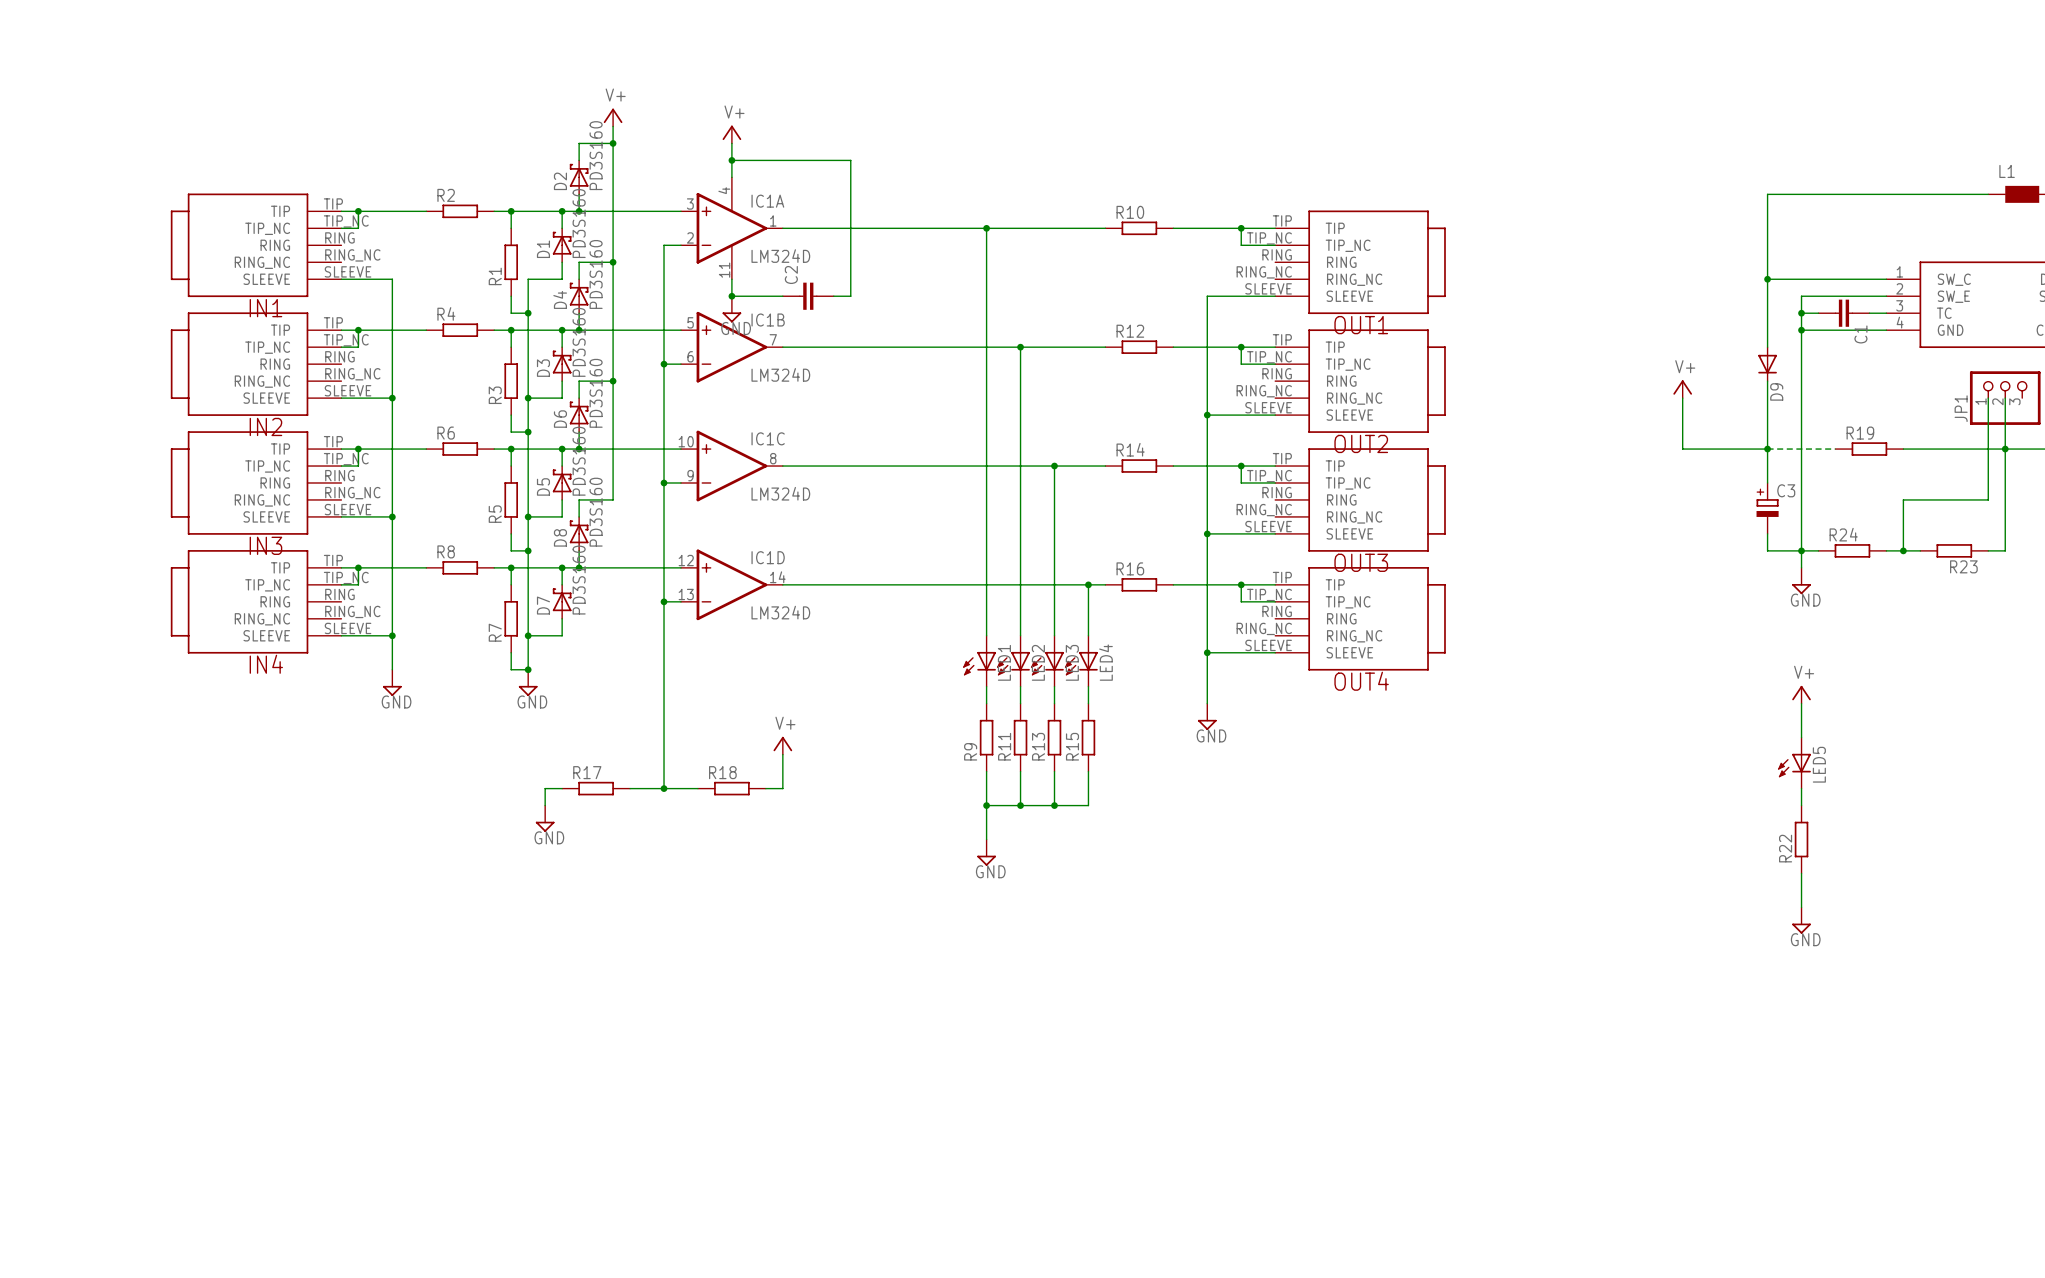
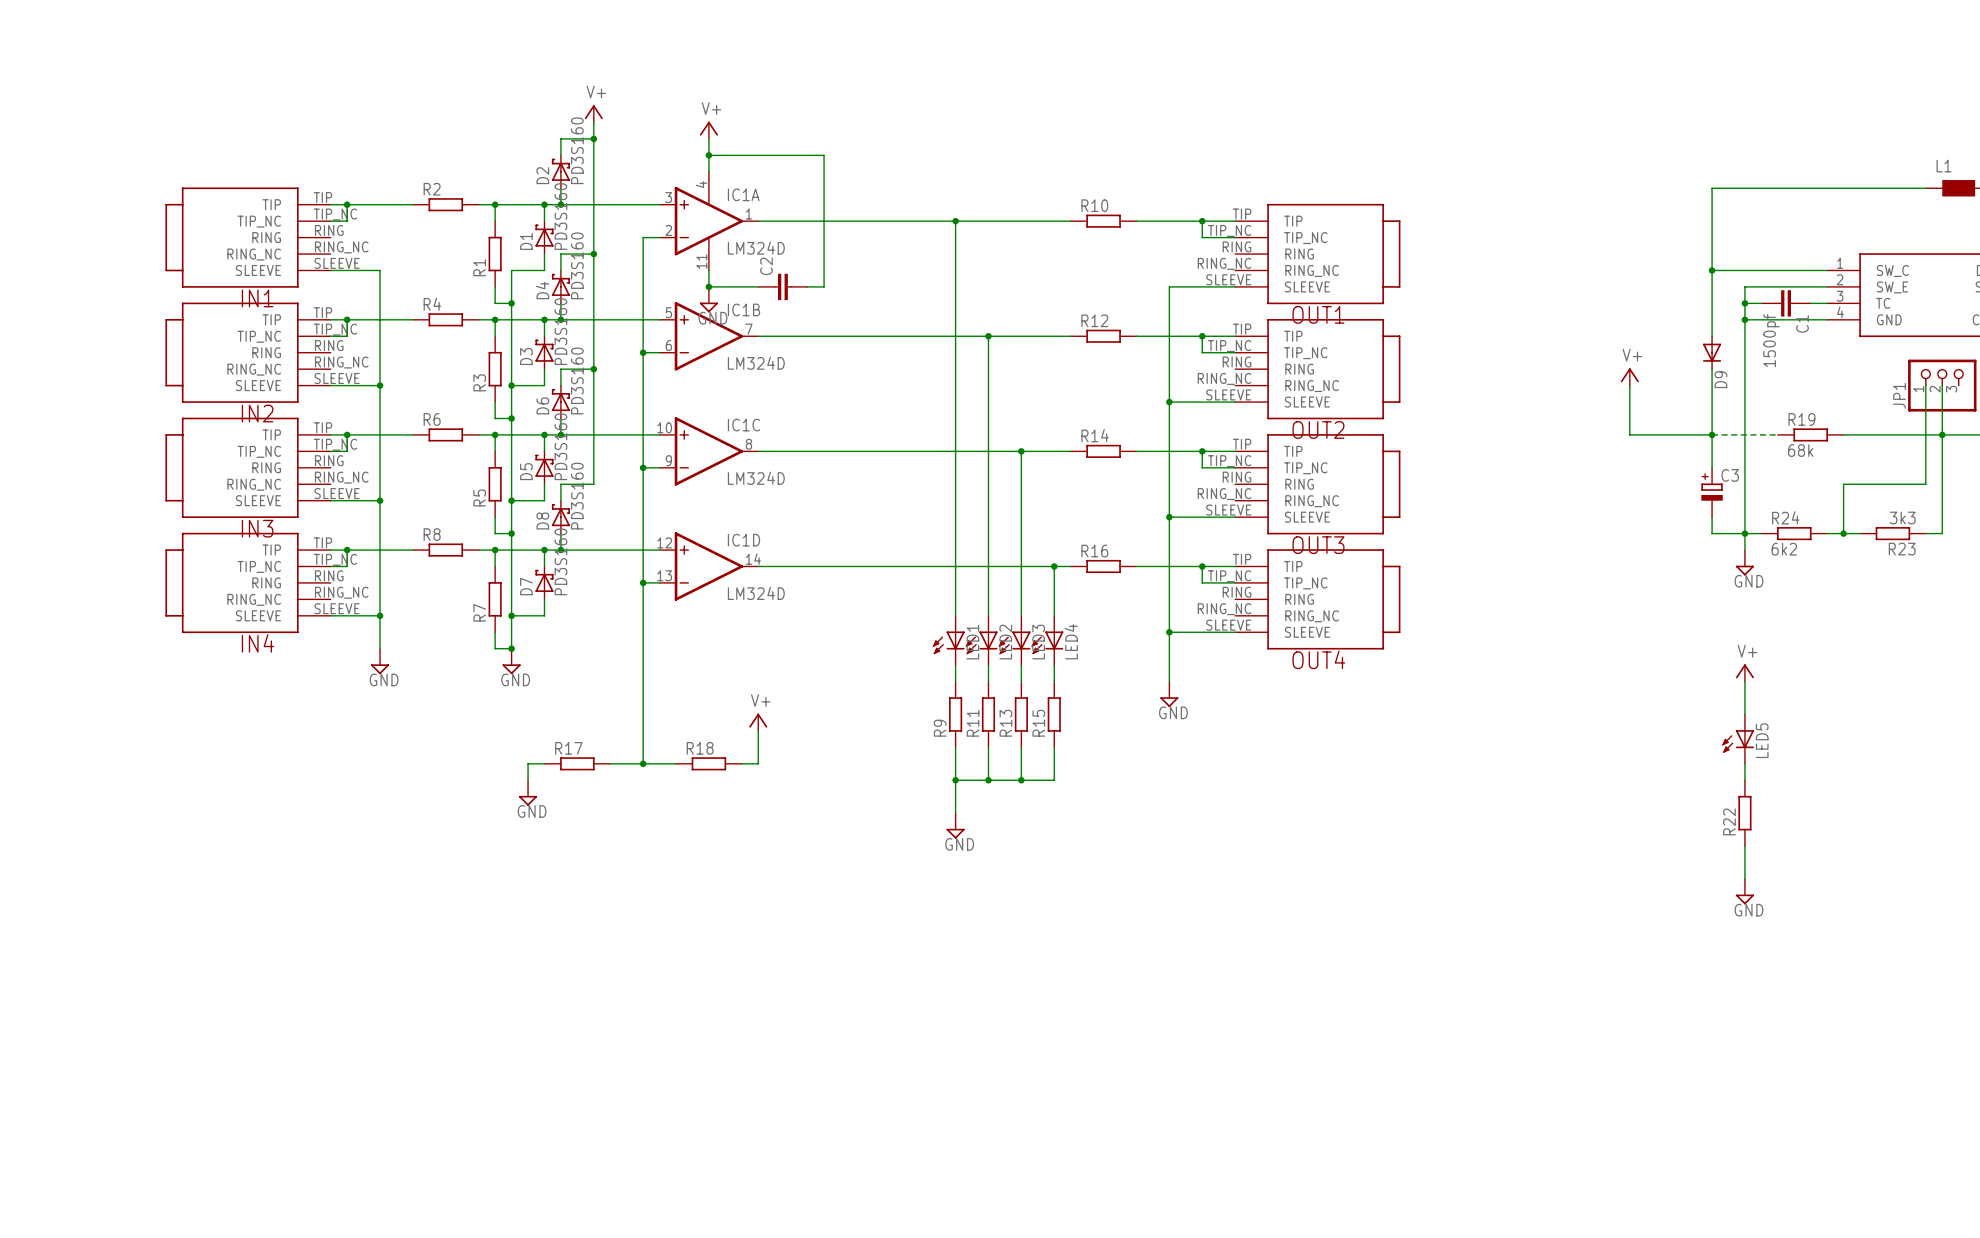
C1 value: none -> 1500pf (1771, 340)
R19 value: none -> 68k (1800, 450)
R23 value: none -> 3k3 (1902, 517)
R24 value: none -> 6k2 (1784, 549)

